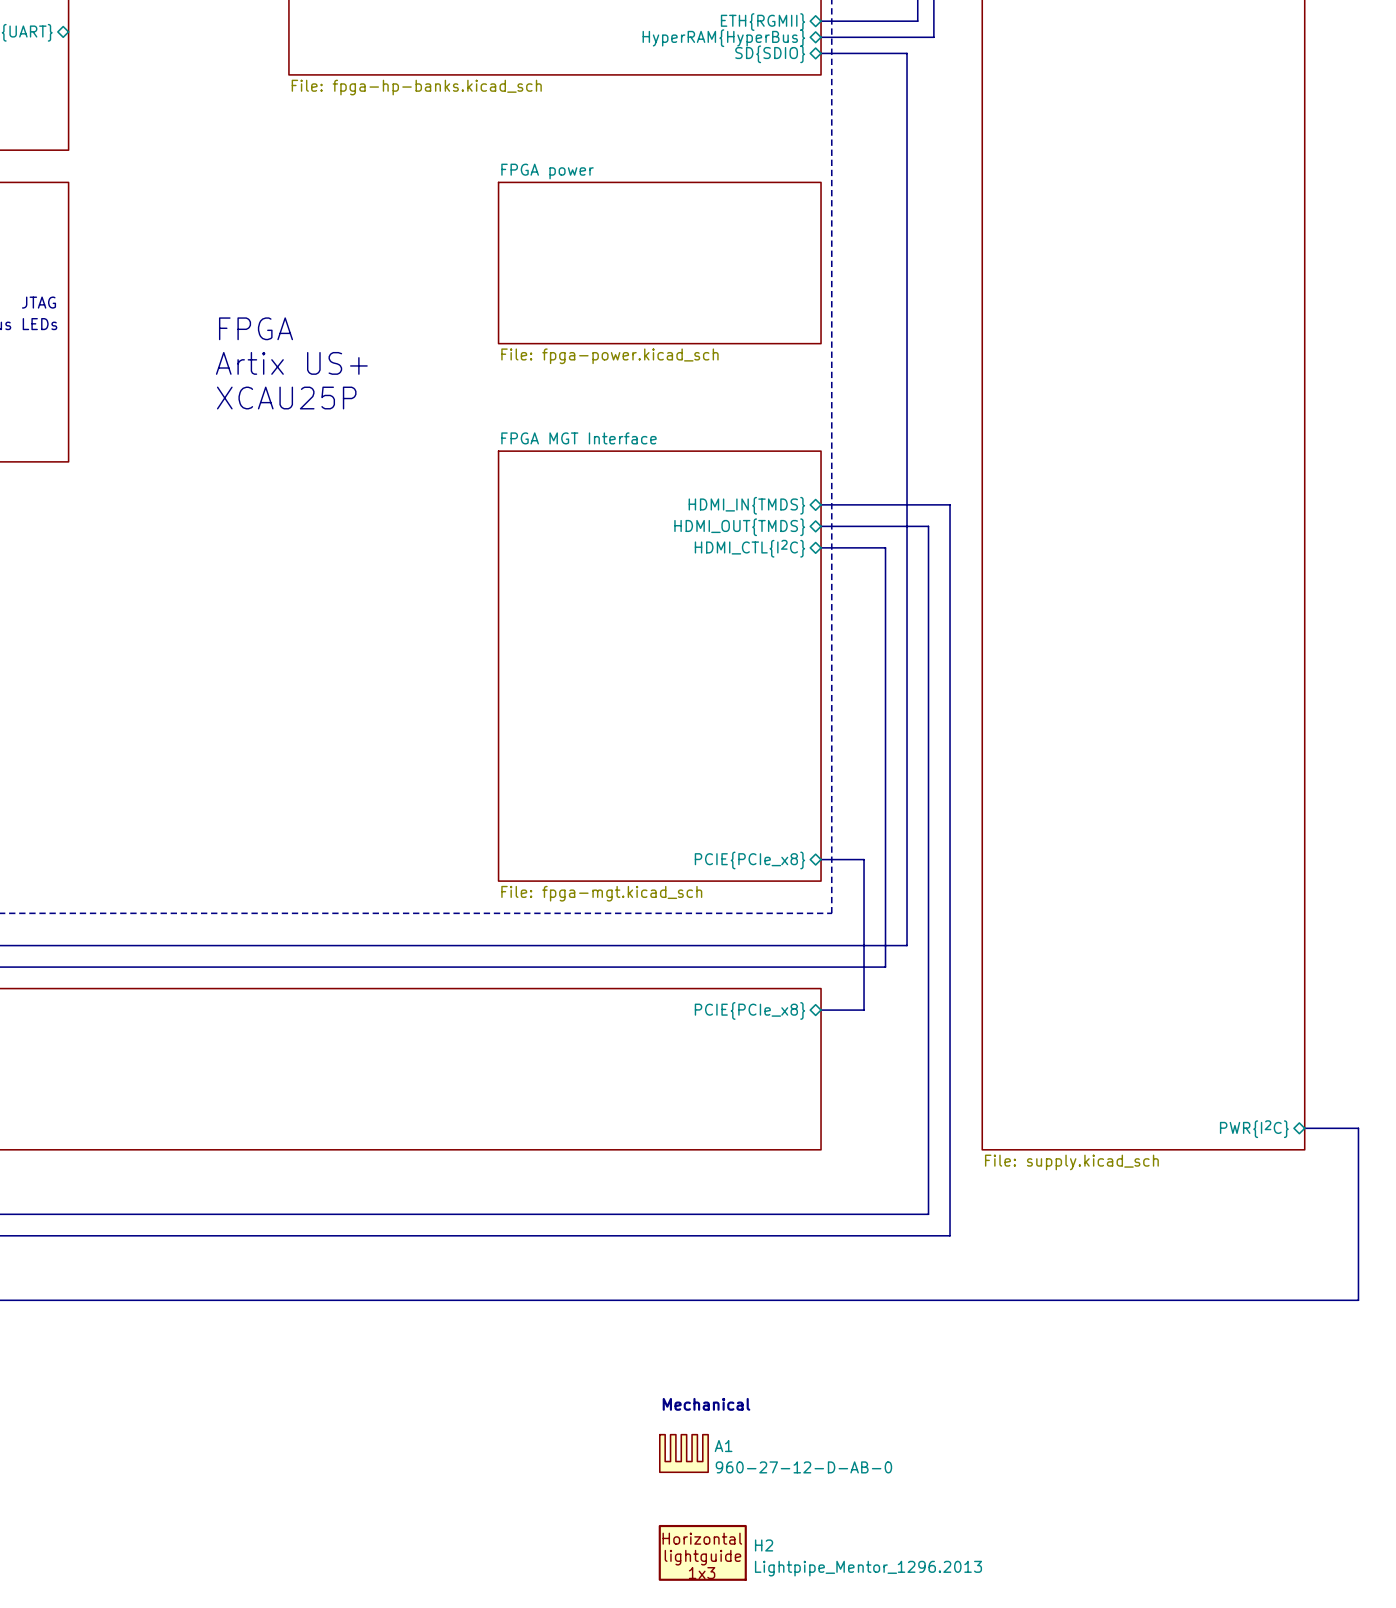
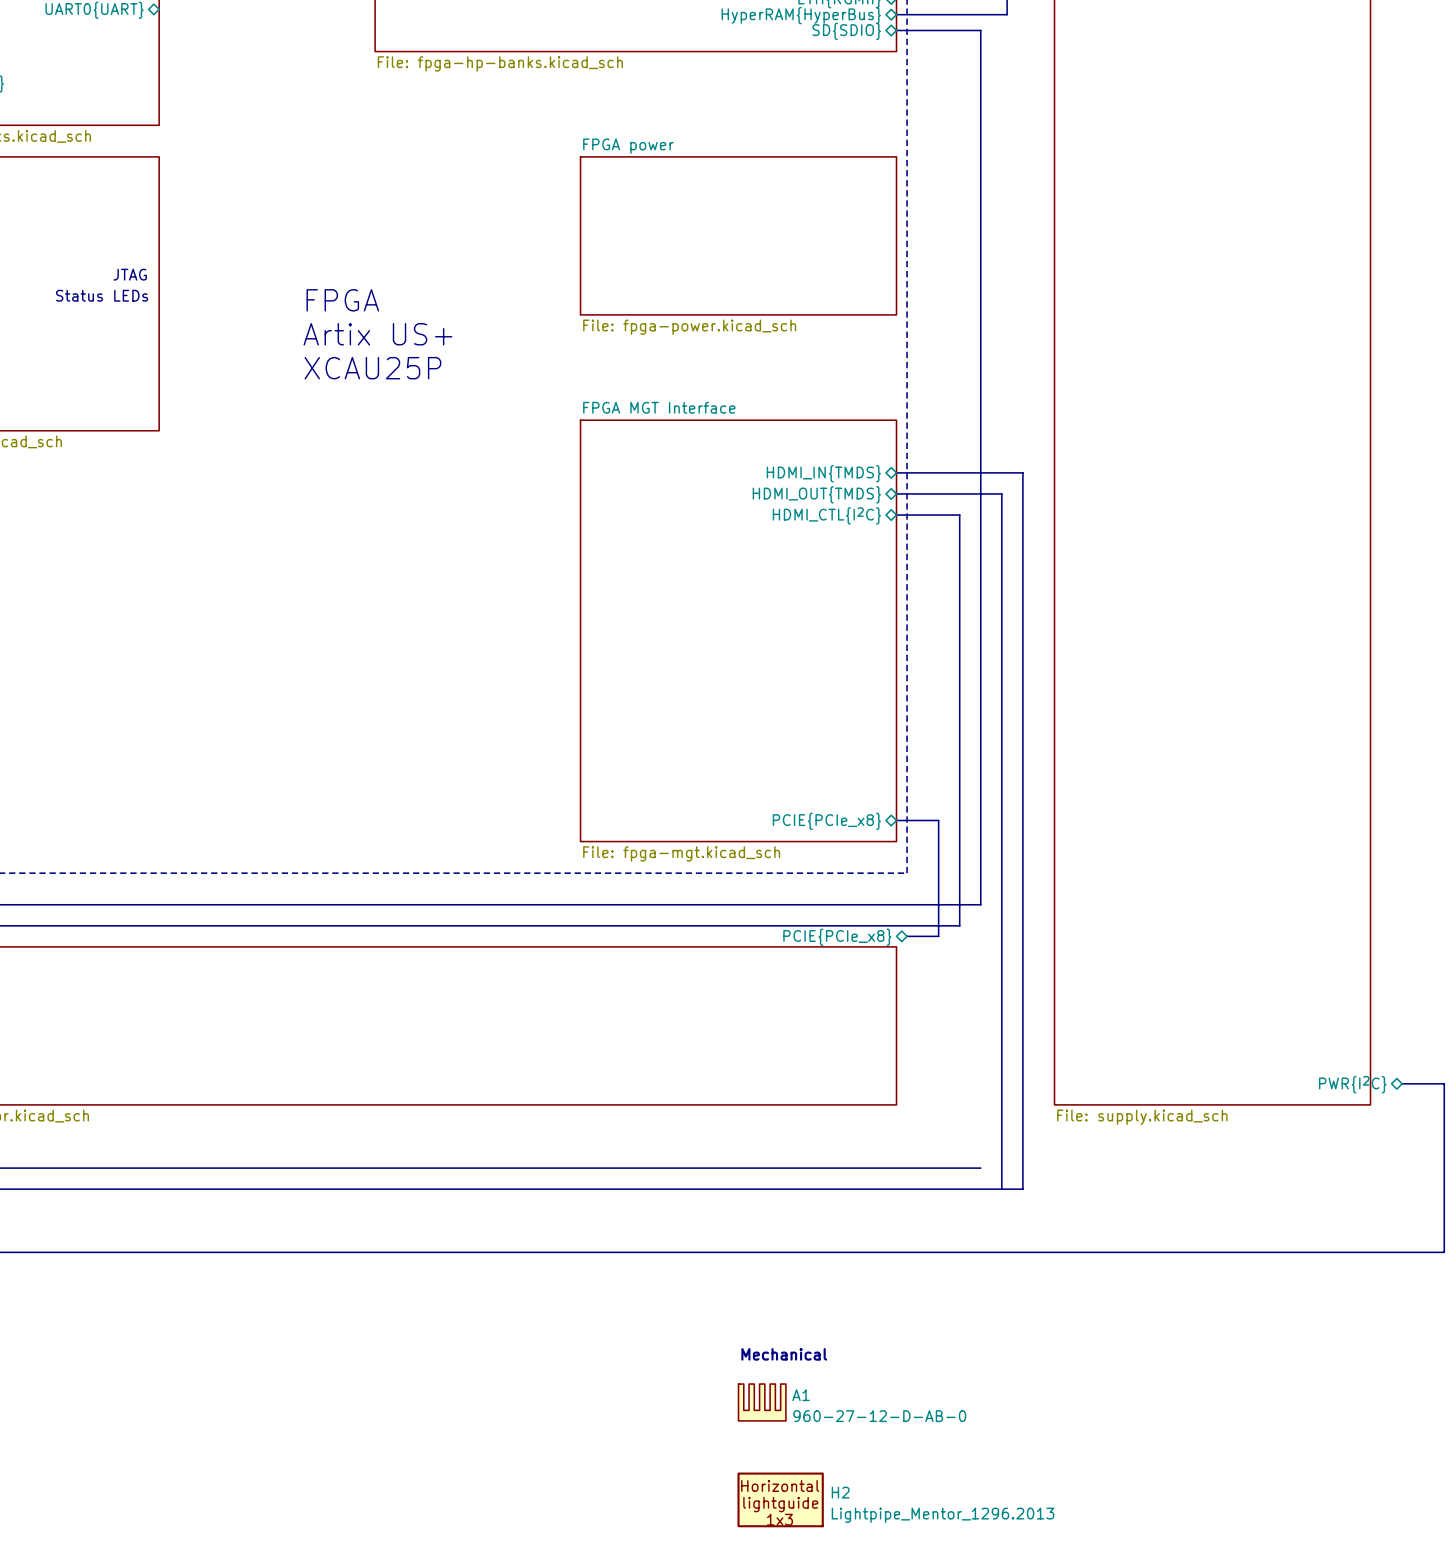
bus: (864, 977) (864, 1010) (821, 1010) -> (938, 936) (907, 936)
sheet pin position: PCIE{PCIe_x8} (749, 1010) -> PCIE{PCIe_x8} (837, 937)
bus: (1304, 1128) (1336, 1128) -> none
bus: (1358, 1128) (1358, 1300) -> (1423, 1083) (1444, 1083) (1444, 1252) (1423, 1252)
sheet pin position: PWR{I2C} (1254, 1129) -> PWR{I2C} (1352, 1084)
bus: (907, 1214) (928, 1214) -> (1001, 1189) (1001, 1168)

